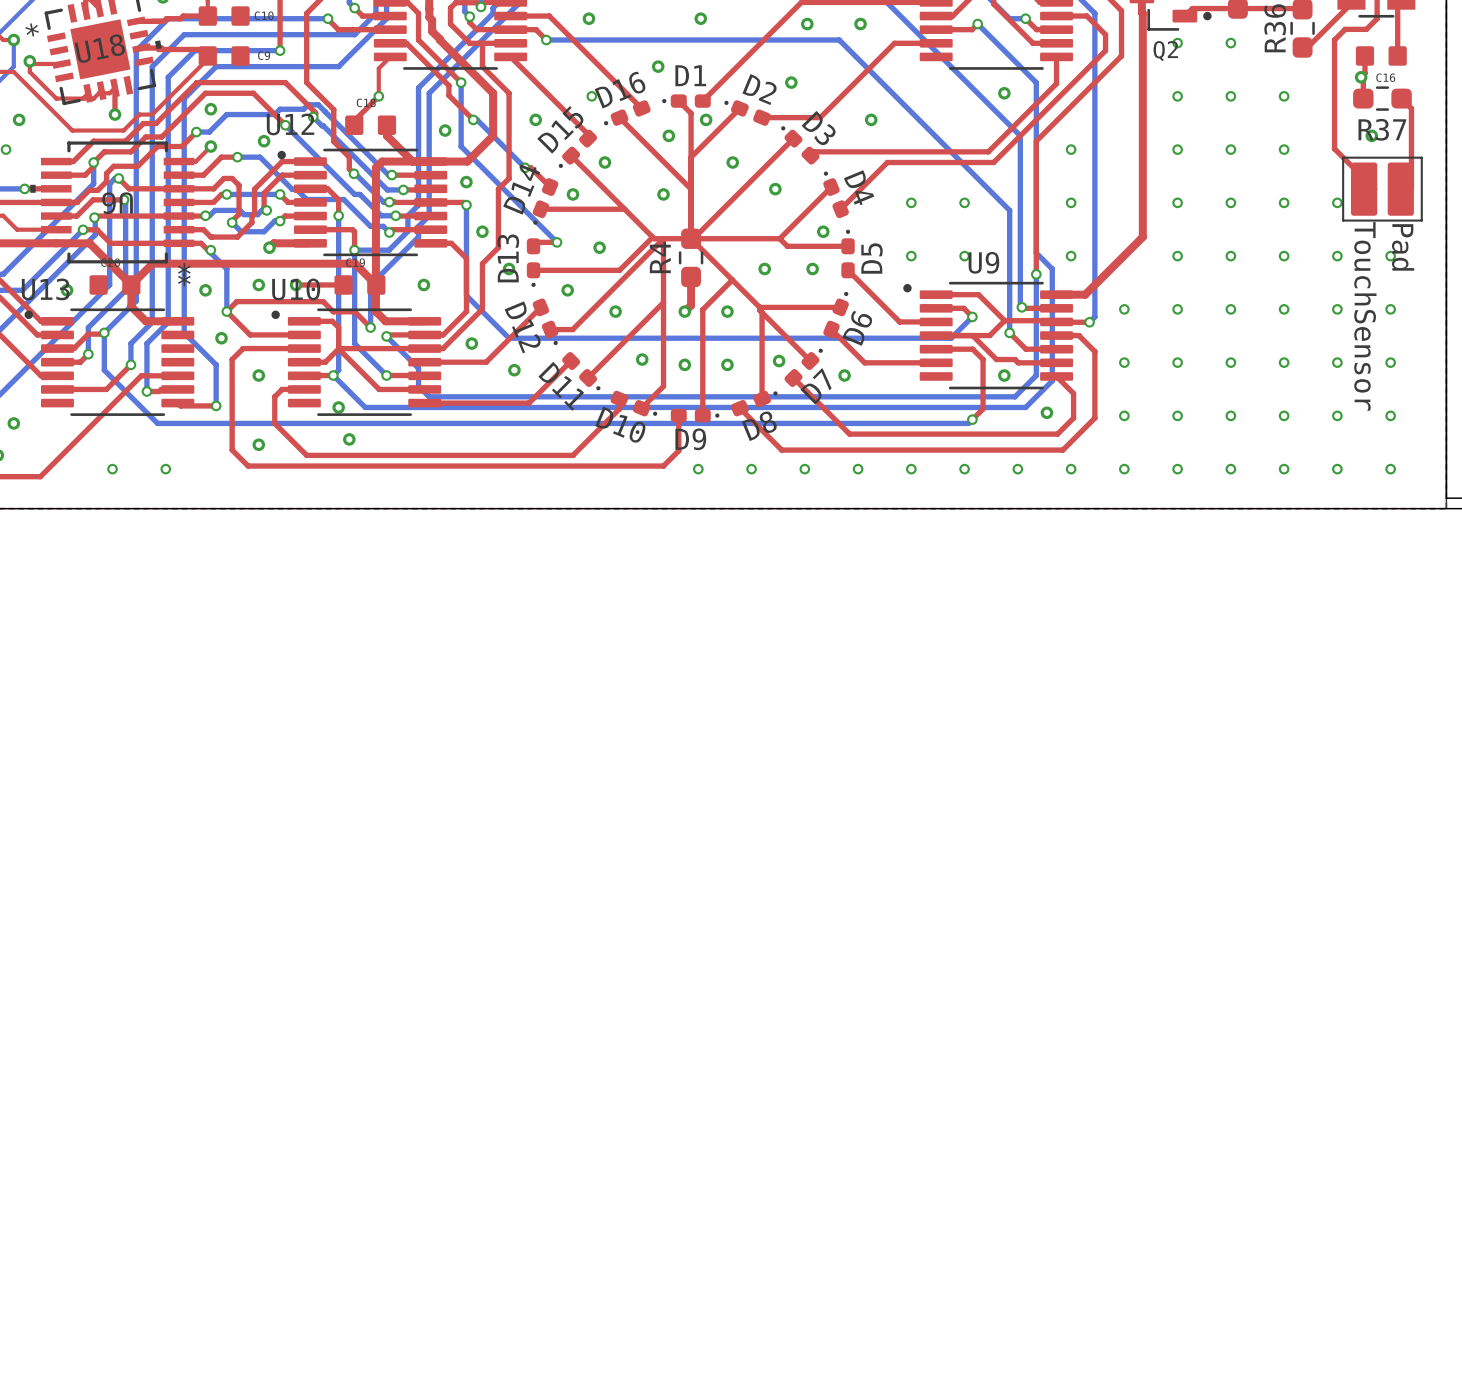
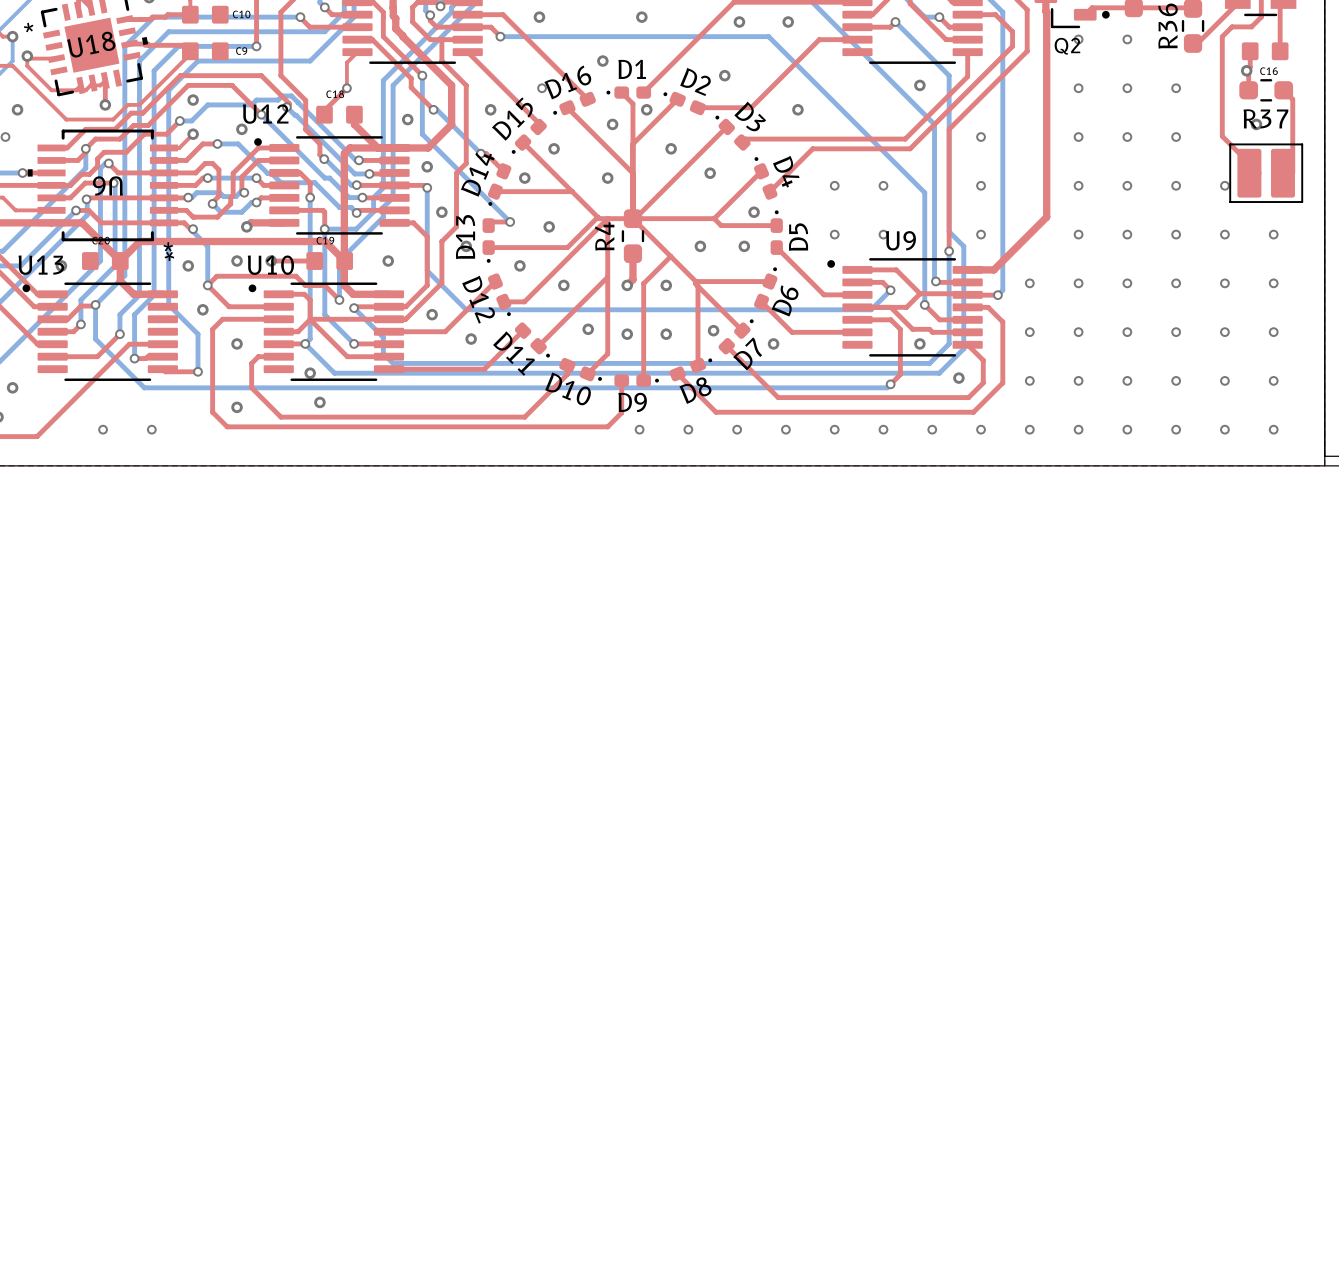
text: Pad (1403, 247) -> none
text: TouchSensor (1365, 316) -> none

